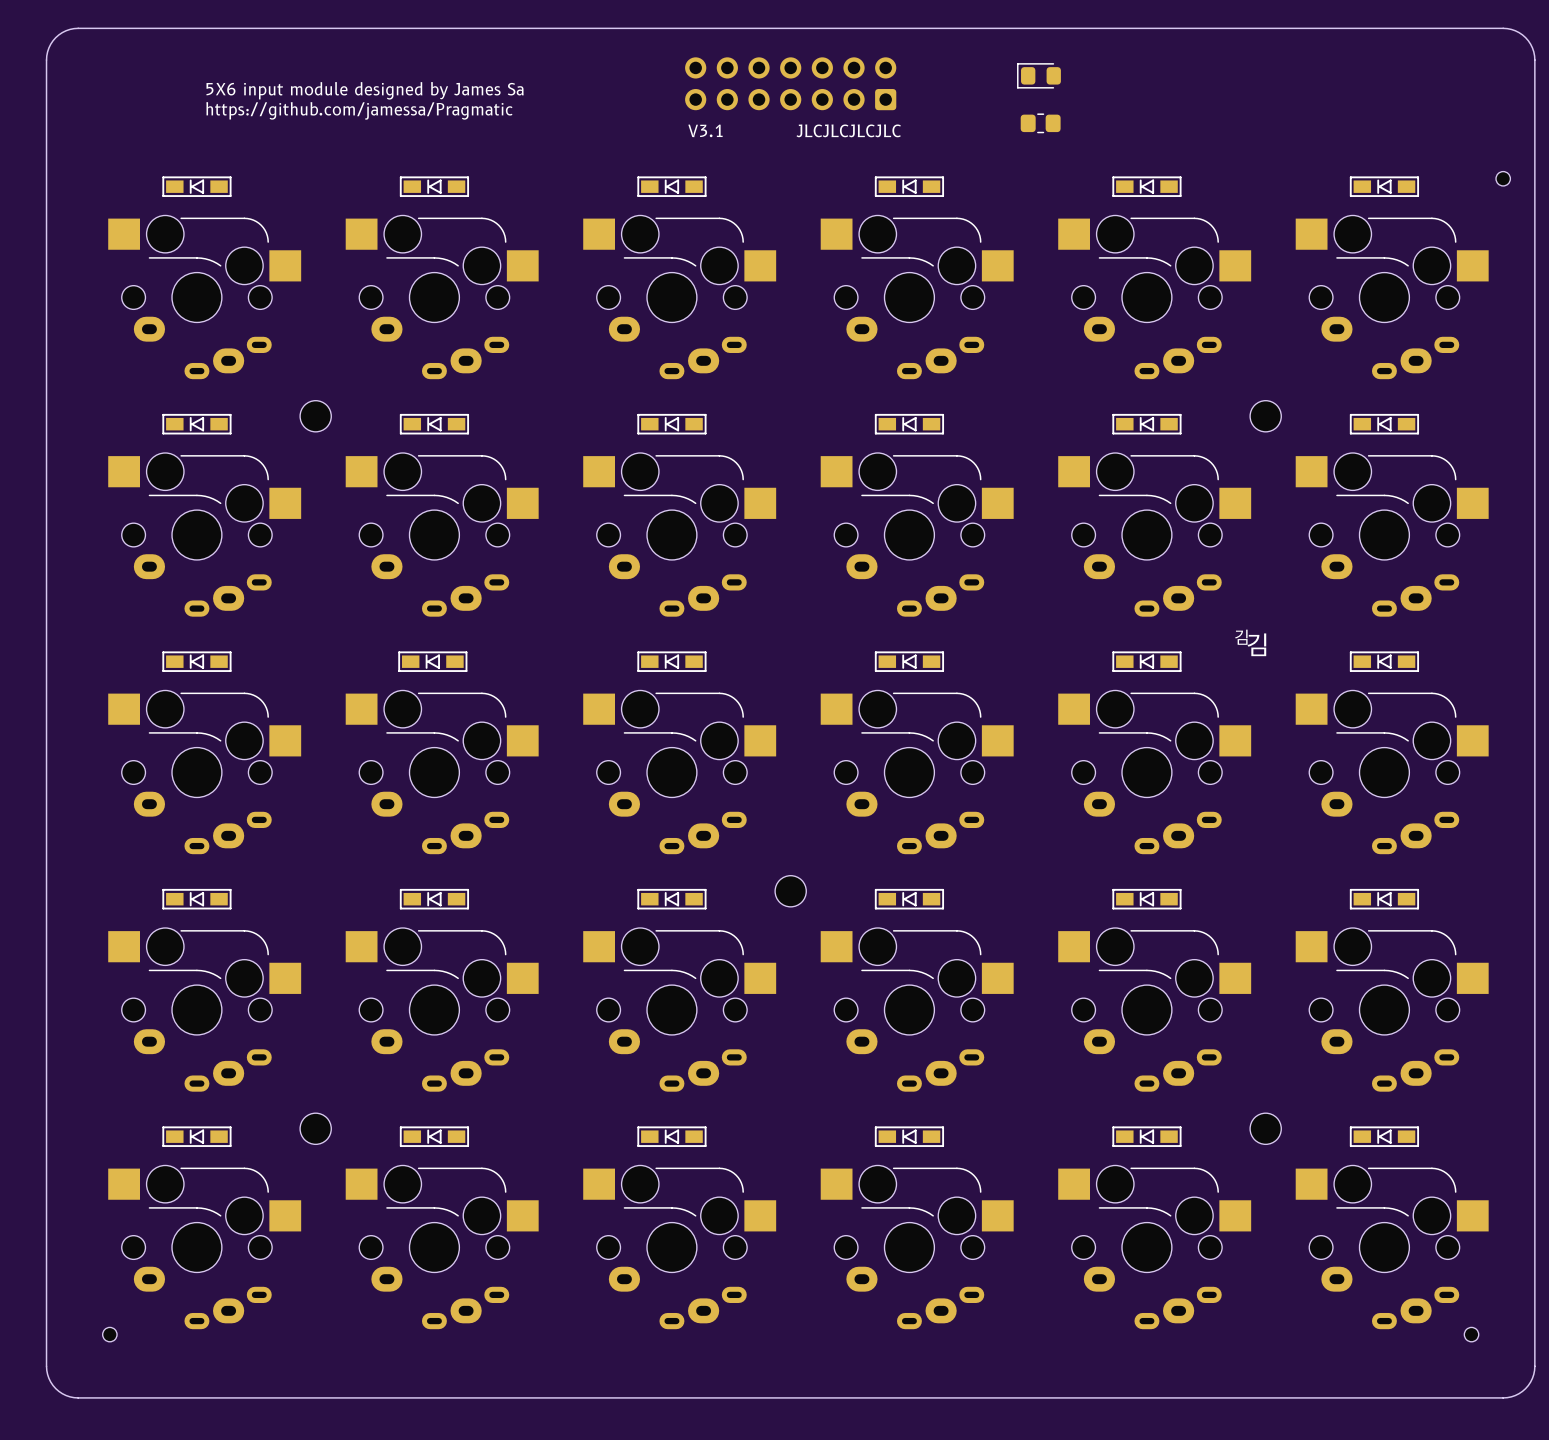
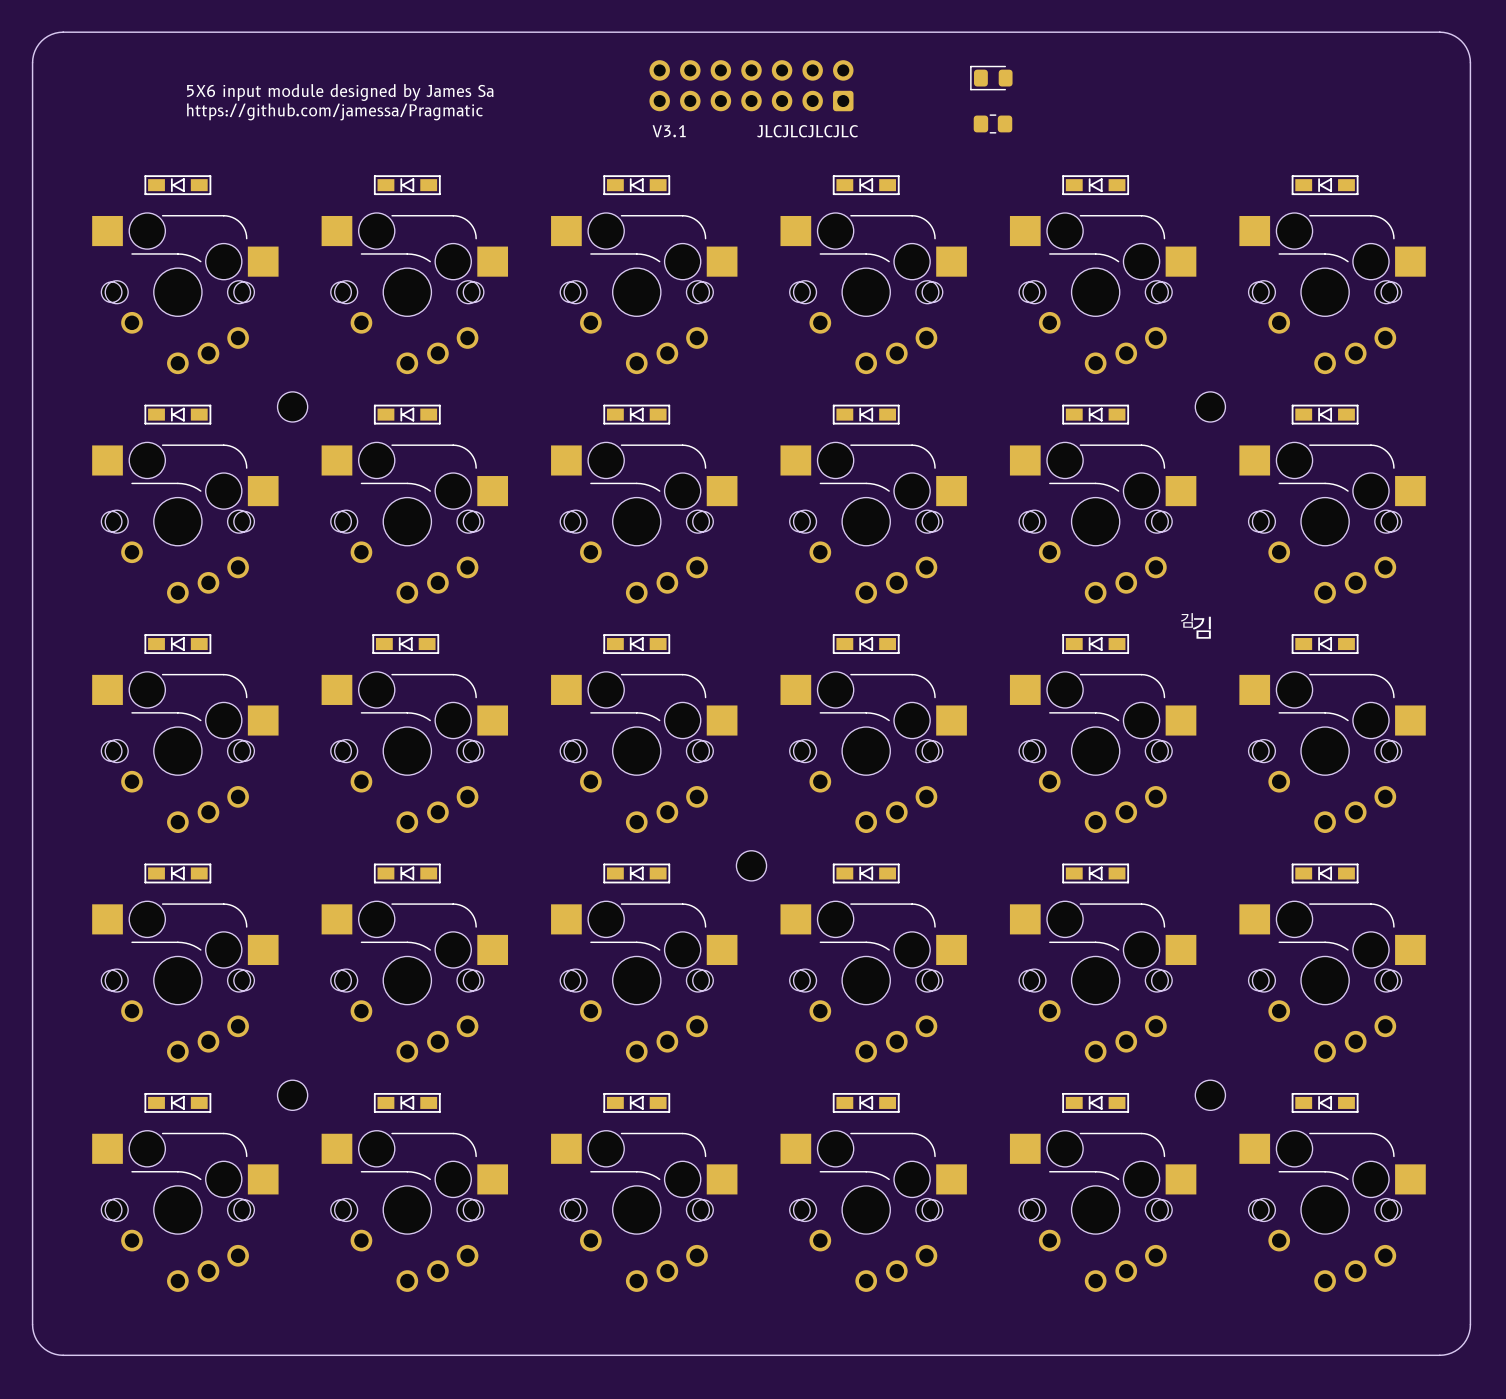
part: (1503, 178) -> none
part footprint: [108, 215, 302, 380] -> [92, 212, 279, 375]
part footprint: [345, 215, 539, 380] -> [321, 212, 509, 375]
part footprint: [583, 215, 777, 380] -> [551, 212, 738, 375]
part footprint: [820, 215, 1014, 380] -> [780, 212, 967, 375]
part footprint: [1058, 215, 1252, 380] -> [1009, 212, 1197, 375]
part footprint: [1295, 215, 1489, 380] -> [1239, 212, 1426, 375]
part footprint: [108, 452, 302, 617] -> [92, 442, 279, 604]
part footprint: [345, 452, 539, 617] -> [321, 442, 509, 604]
part footprint: [583, 452, 777, 617] -> [551, 442, 738, 604]
part footprint: [820, 452, 1014, 617] -> [780, 442, 967, 604]
part footprint: [1058, 452, 1252, 617] -> [1009, 442, 1197, 604]
part footprint: [1295, 452, 1489, 617] -> [1239, 442, 1426, 604]
part footprint: [108, 690, 302, 855] -> [92, 671, 279, 834]
part footprint: [345, 690, 539, 855] -> [321, 671, 509, 834]
part footprint: [583, 690, 777, 855] -> [551, 671, 738, 834]
part footprint: [820, 690, 1014, 855] -> [780, 671, 967, 834]
part footprint: [1058, 690, 1252, 855] -> [1009, 671, 1197, 834]
part footprint: [1295, 690, 1489, 855] -> [1239, 671, 1426, 834]
part footprint: [108, 927, 302, 1092] -> [92, 901, 279, 1063]
part footprint: [345, 927, 539, 1092] -> [321, 901, 509, 1063]
part footprint: [583, 927, 777, 1092] -> [551, 901, 738, 1063]
part footprint: [820, 927, 1014, 1092] -> [780, 901, 967, 1063]
part footprint: [1058, 927, 1252, 1092] -> [1009, 901, 1197, 1063]
part footprint: [1295, 927, 1489, 1092] -> [1239, 901, 1426, 1063]
part footprint: [108, 1165, 302, 1330] -> [92, 1130, 279, 1292]
part footprint: [345, 1165, 539, 1330] -> [321, 1130, 509, 1292]
part footprint: [583, 1165, 777, 1330] -> [551, 1130, 738, 1292]
part footprint: [820, 1165, 1014, 1330] -> [780, 1130, 967, 1292]
part footprint: [1058, 1165, 1252, 1330] -> [1009, 1130, 1197, 1292]
part footprint: [1295, 1165, 1489, 1330] -> [1239, 1130, 1426, 1292]
part: (109, 1334) -> none
part: (1471, 1334) -> none

